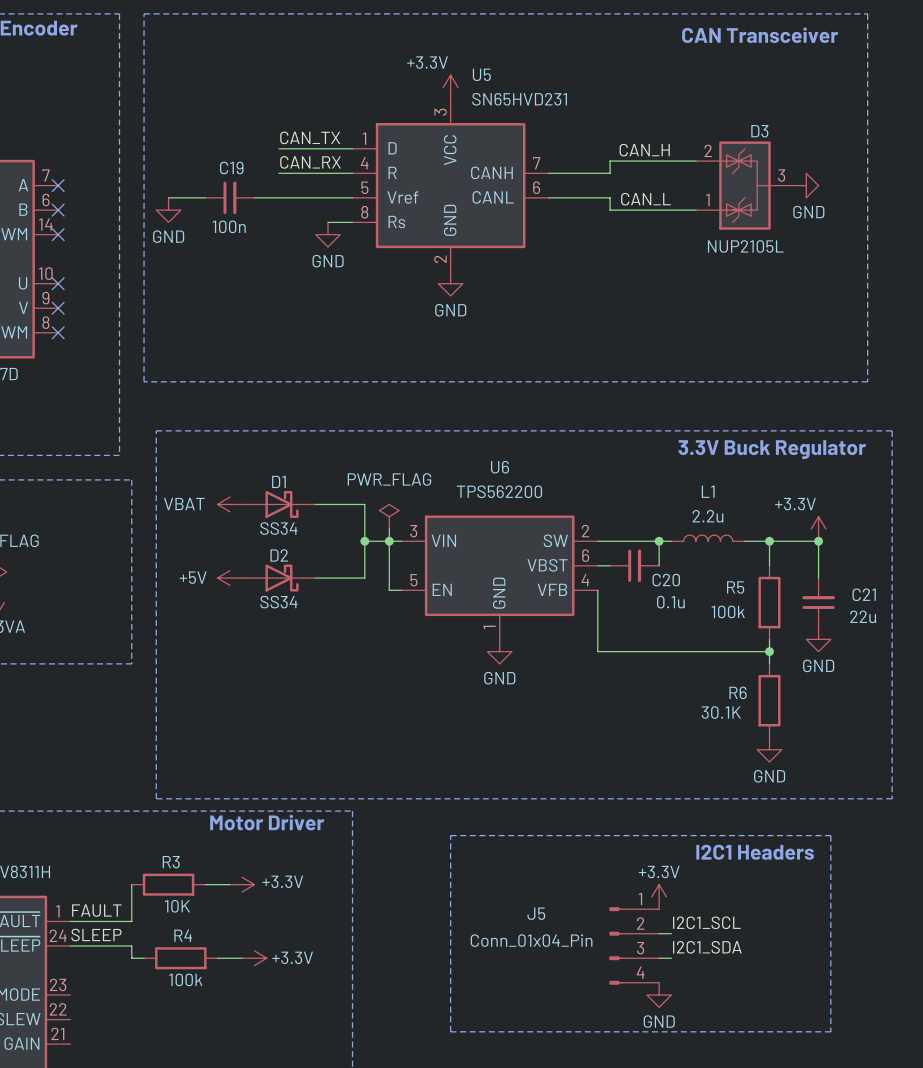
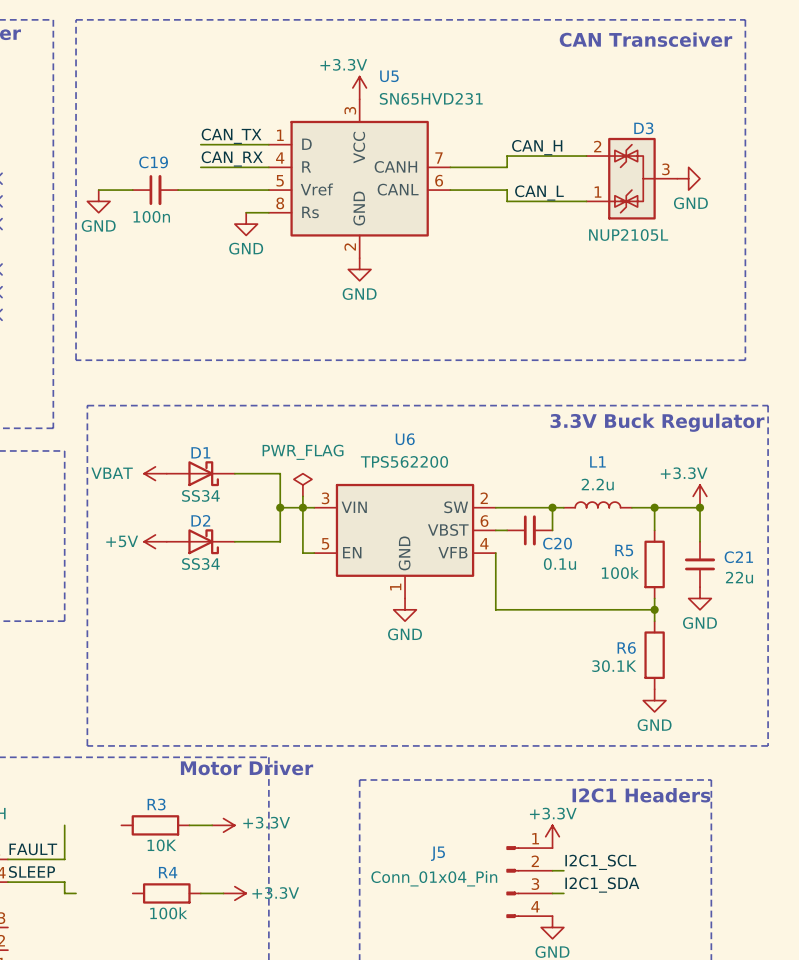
text position: Motor Driver (267, 822) -> Motor Driver (247, 768)
R3 position: (168, 884) -> (155, 825)
wire: (205, 884) (229, 884) -> (189, 825) (212, 825)
power symbol: +3.3V (242, 884) -> none
power symbol: none -> +3.3V (223, 825)
R4 position: (180, 958) -> (166, 893)
wire: (217, 958) (242, 958) -> (200, 893) (223, 893)
power symbol: +3.3V (254, 958) -> none
power symbol: none -> +3.3V (234, 893)

